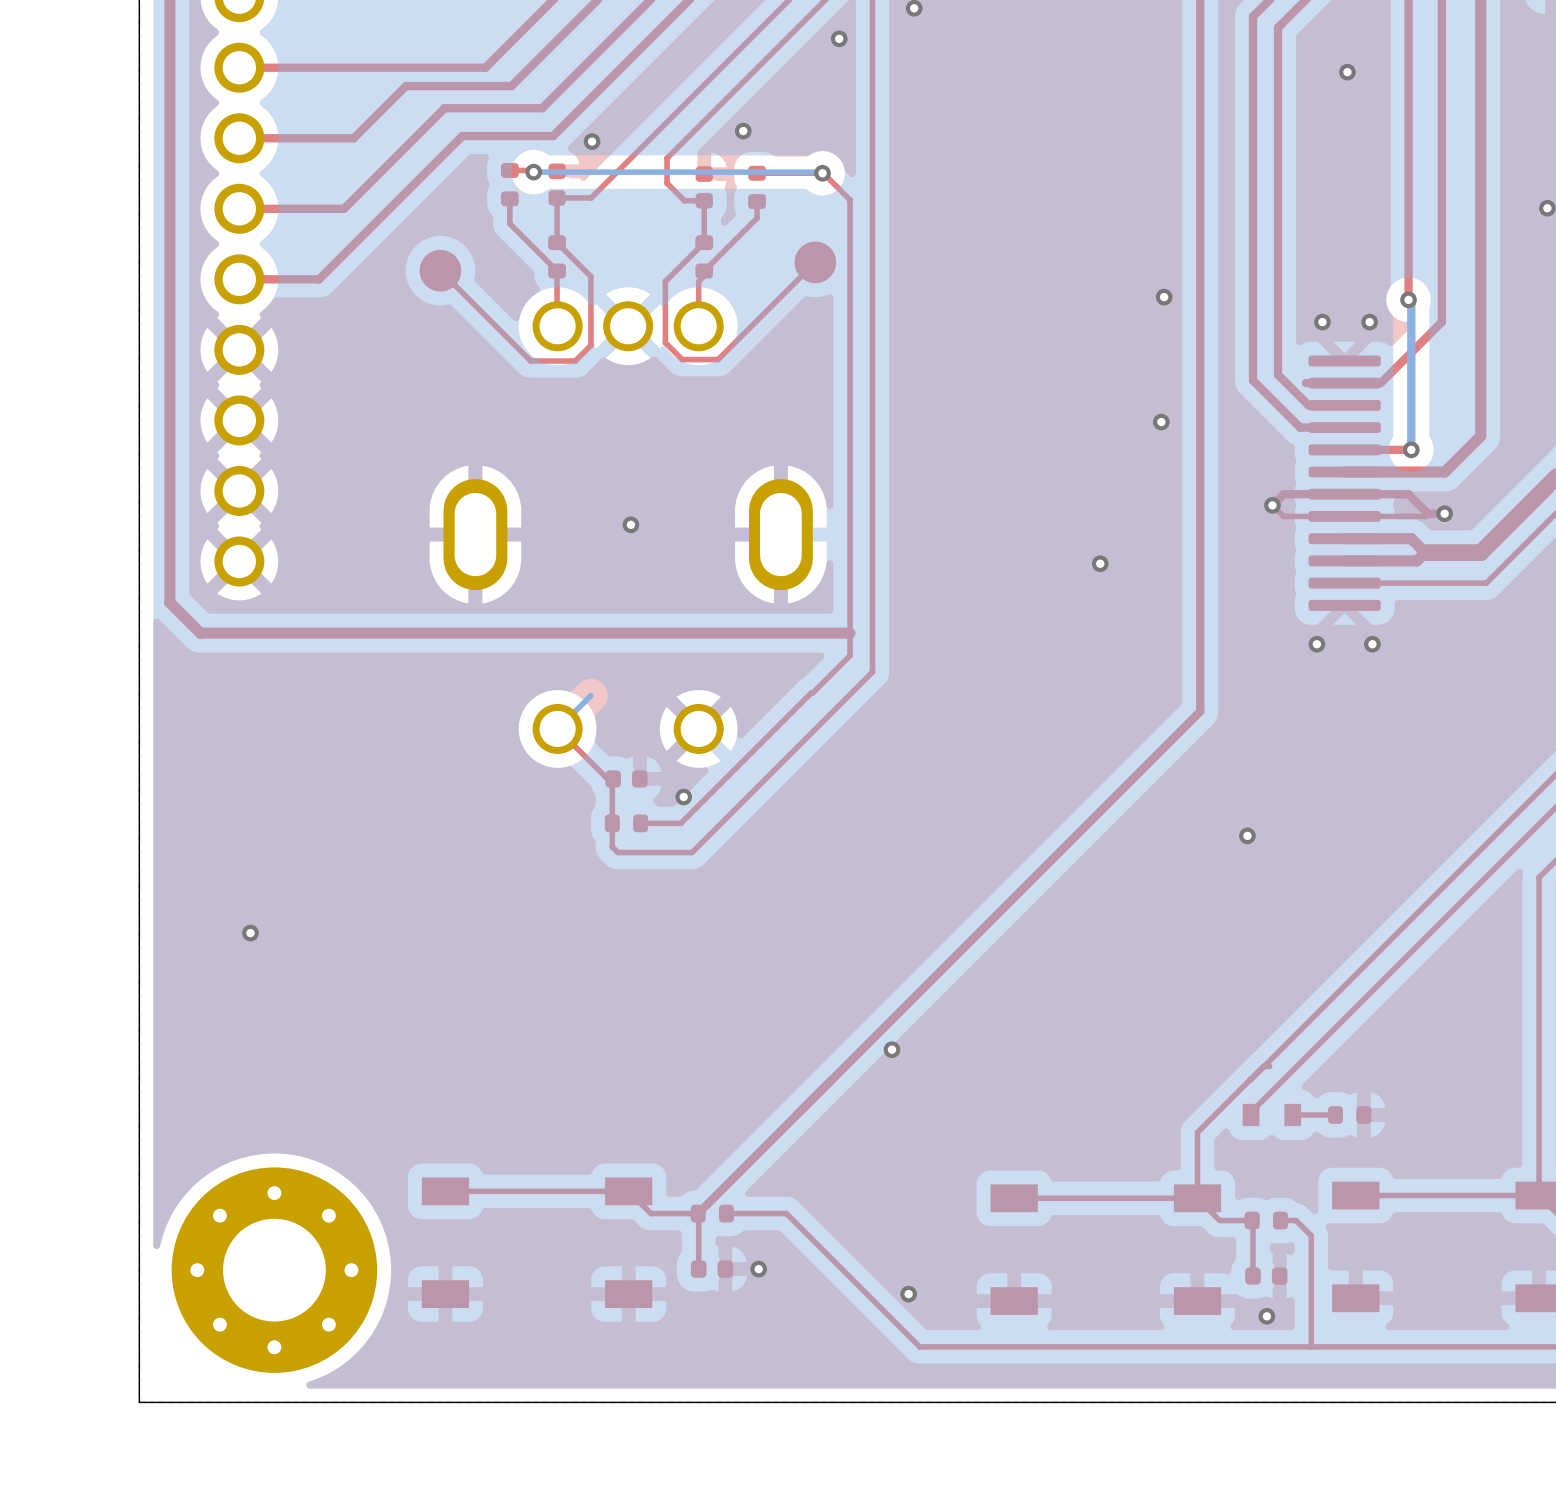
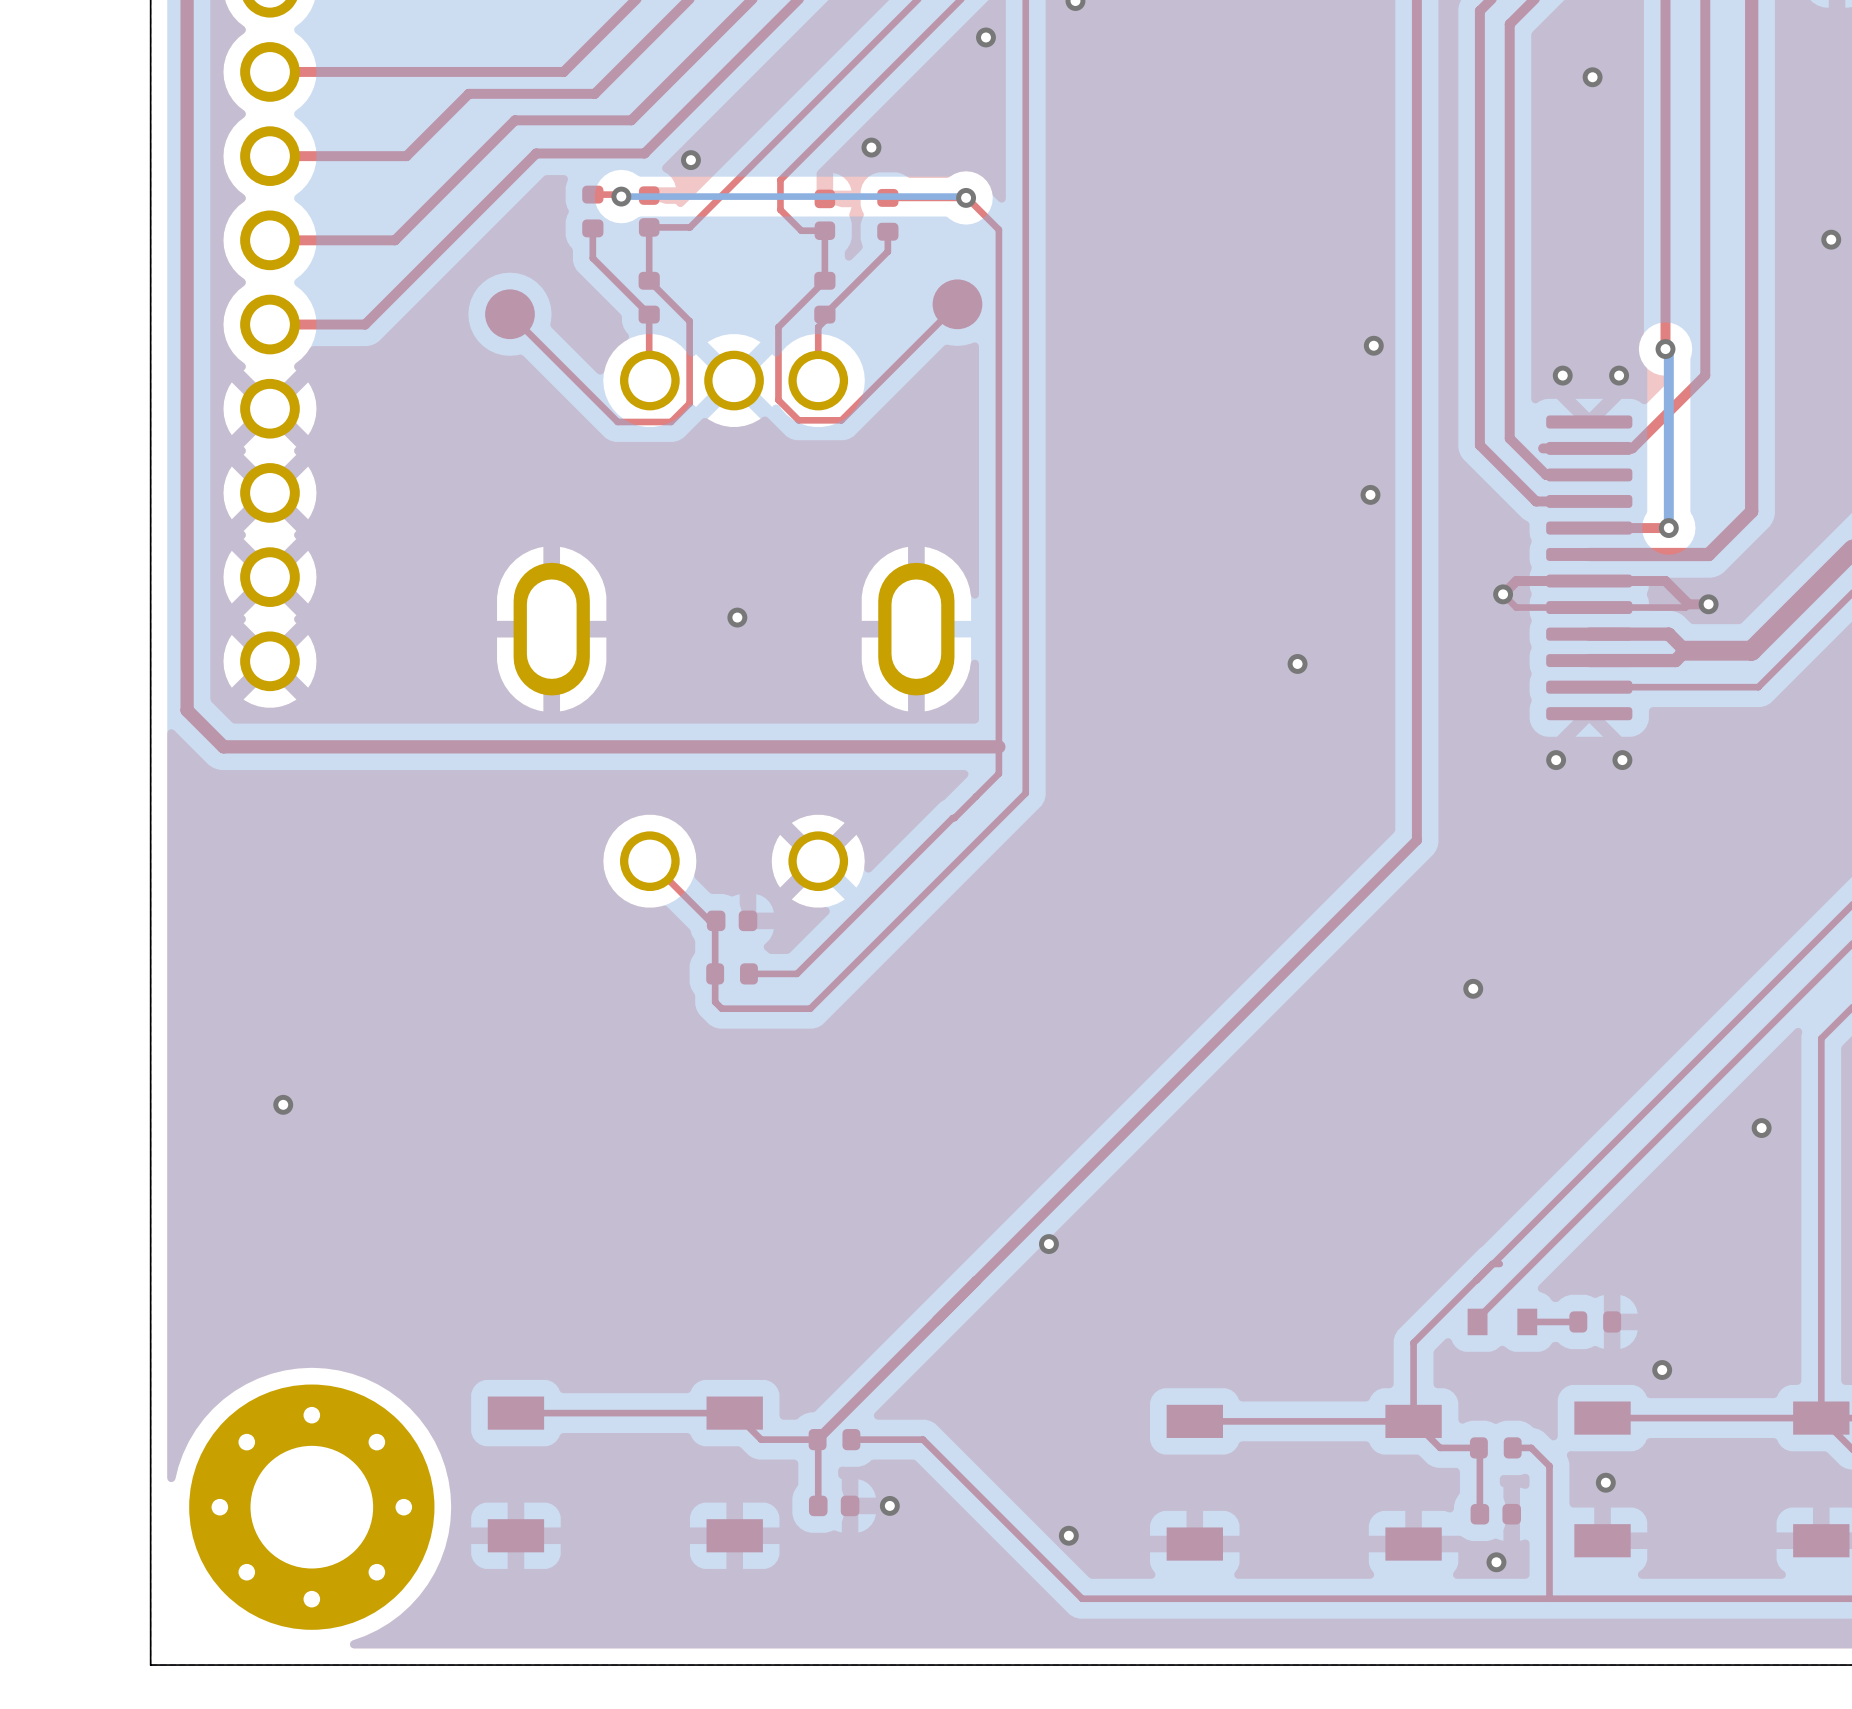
bottom track: (590, 695) (557, 728) -> none
via: (683, 797) -> none
via: none -> (1761, 1128)
via: none -> (1662, 1370)
via: none -> (1605, 1482)

